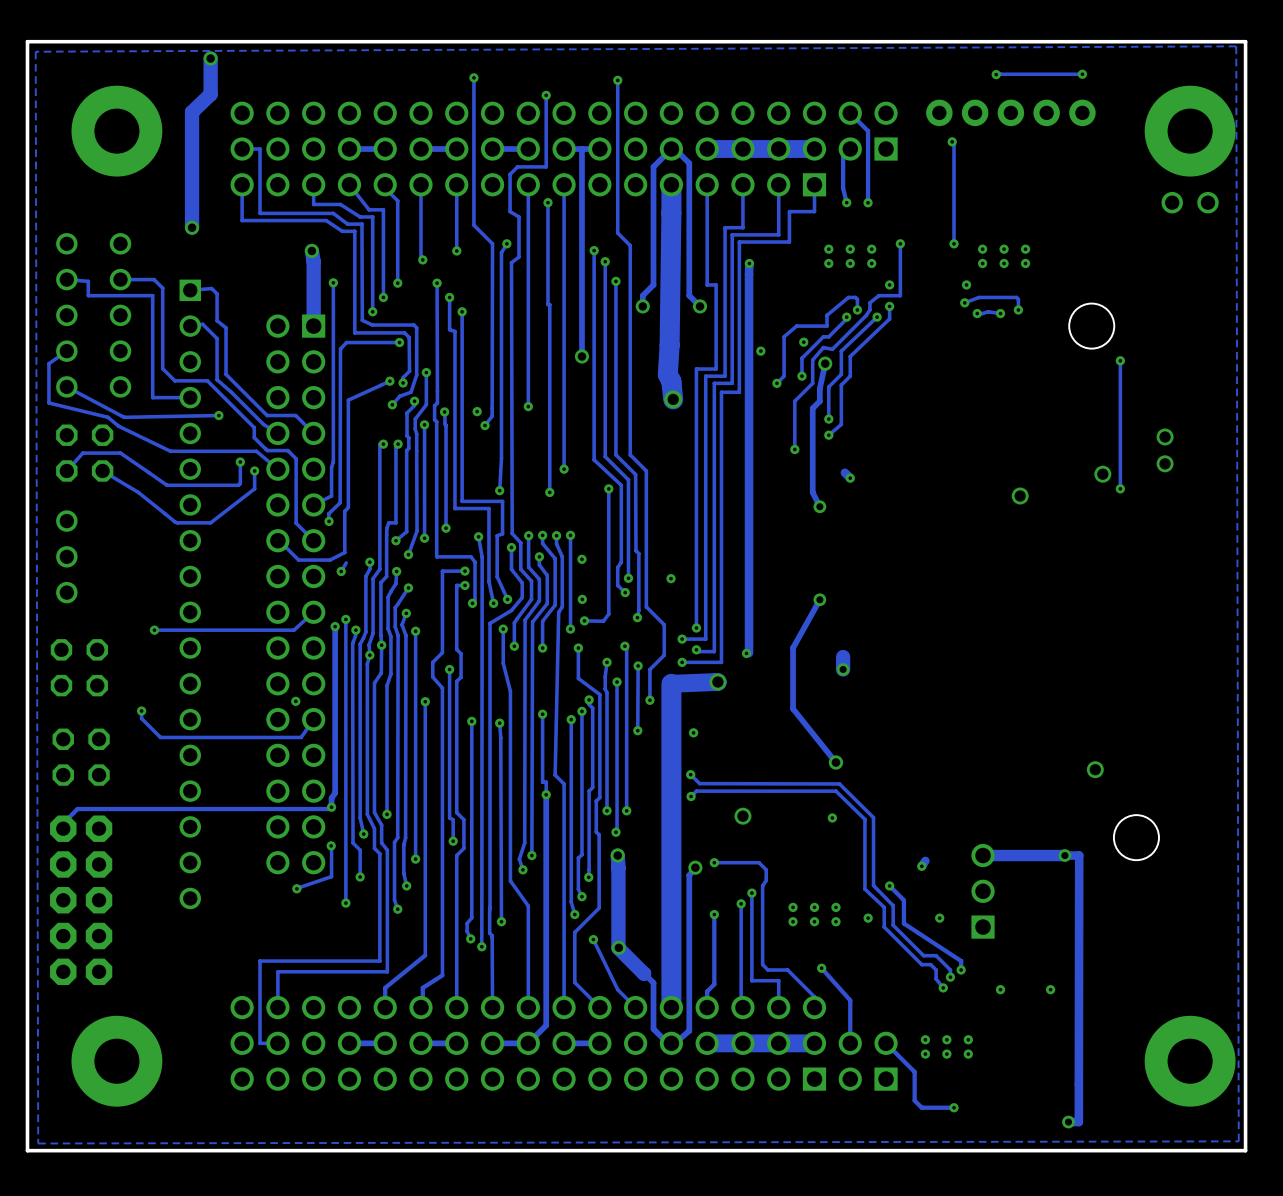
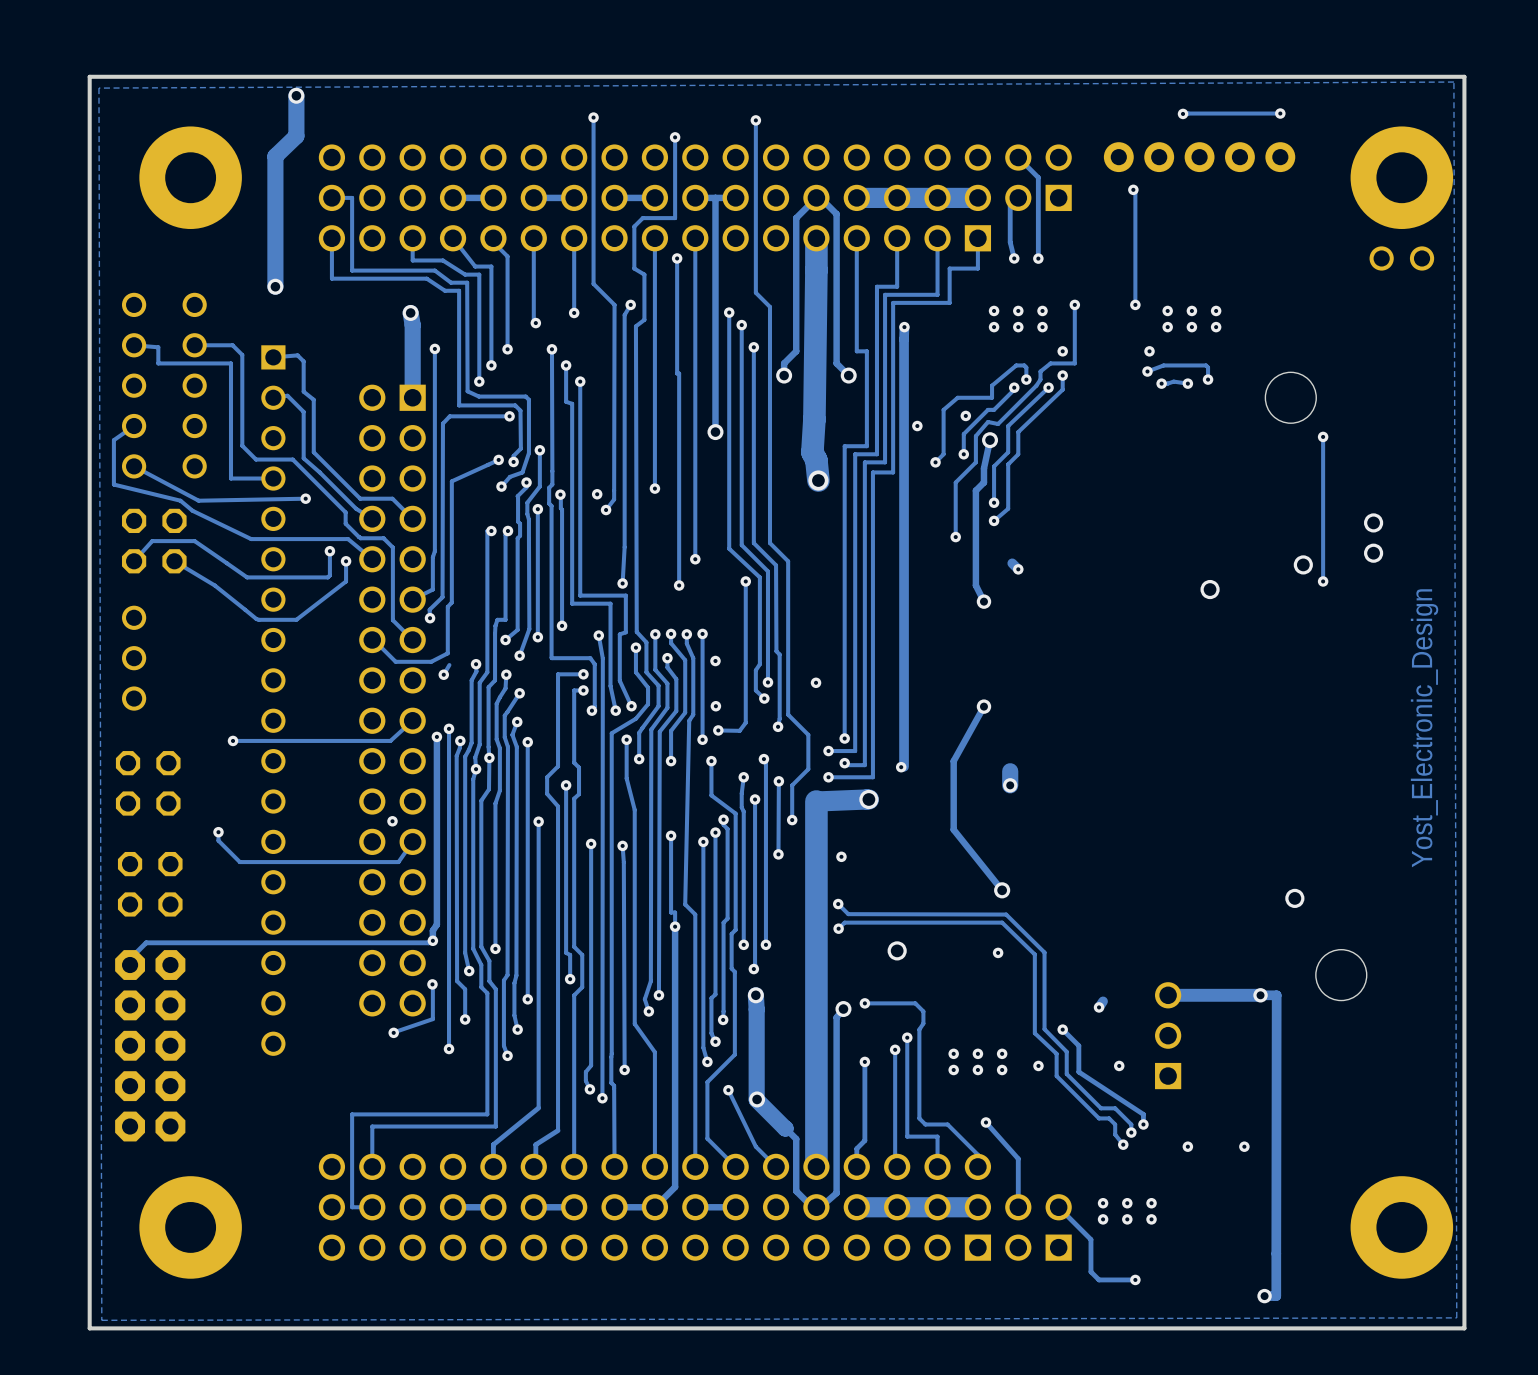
text: none -> Yost_Electronic_Design (1424, 728)

